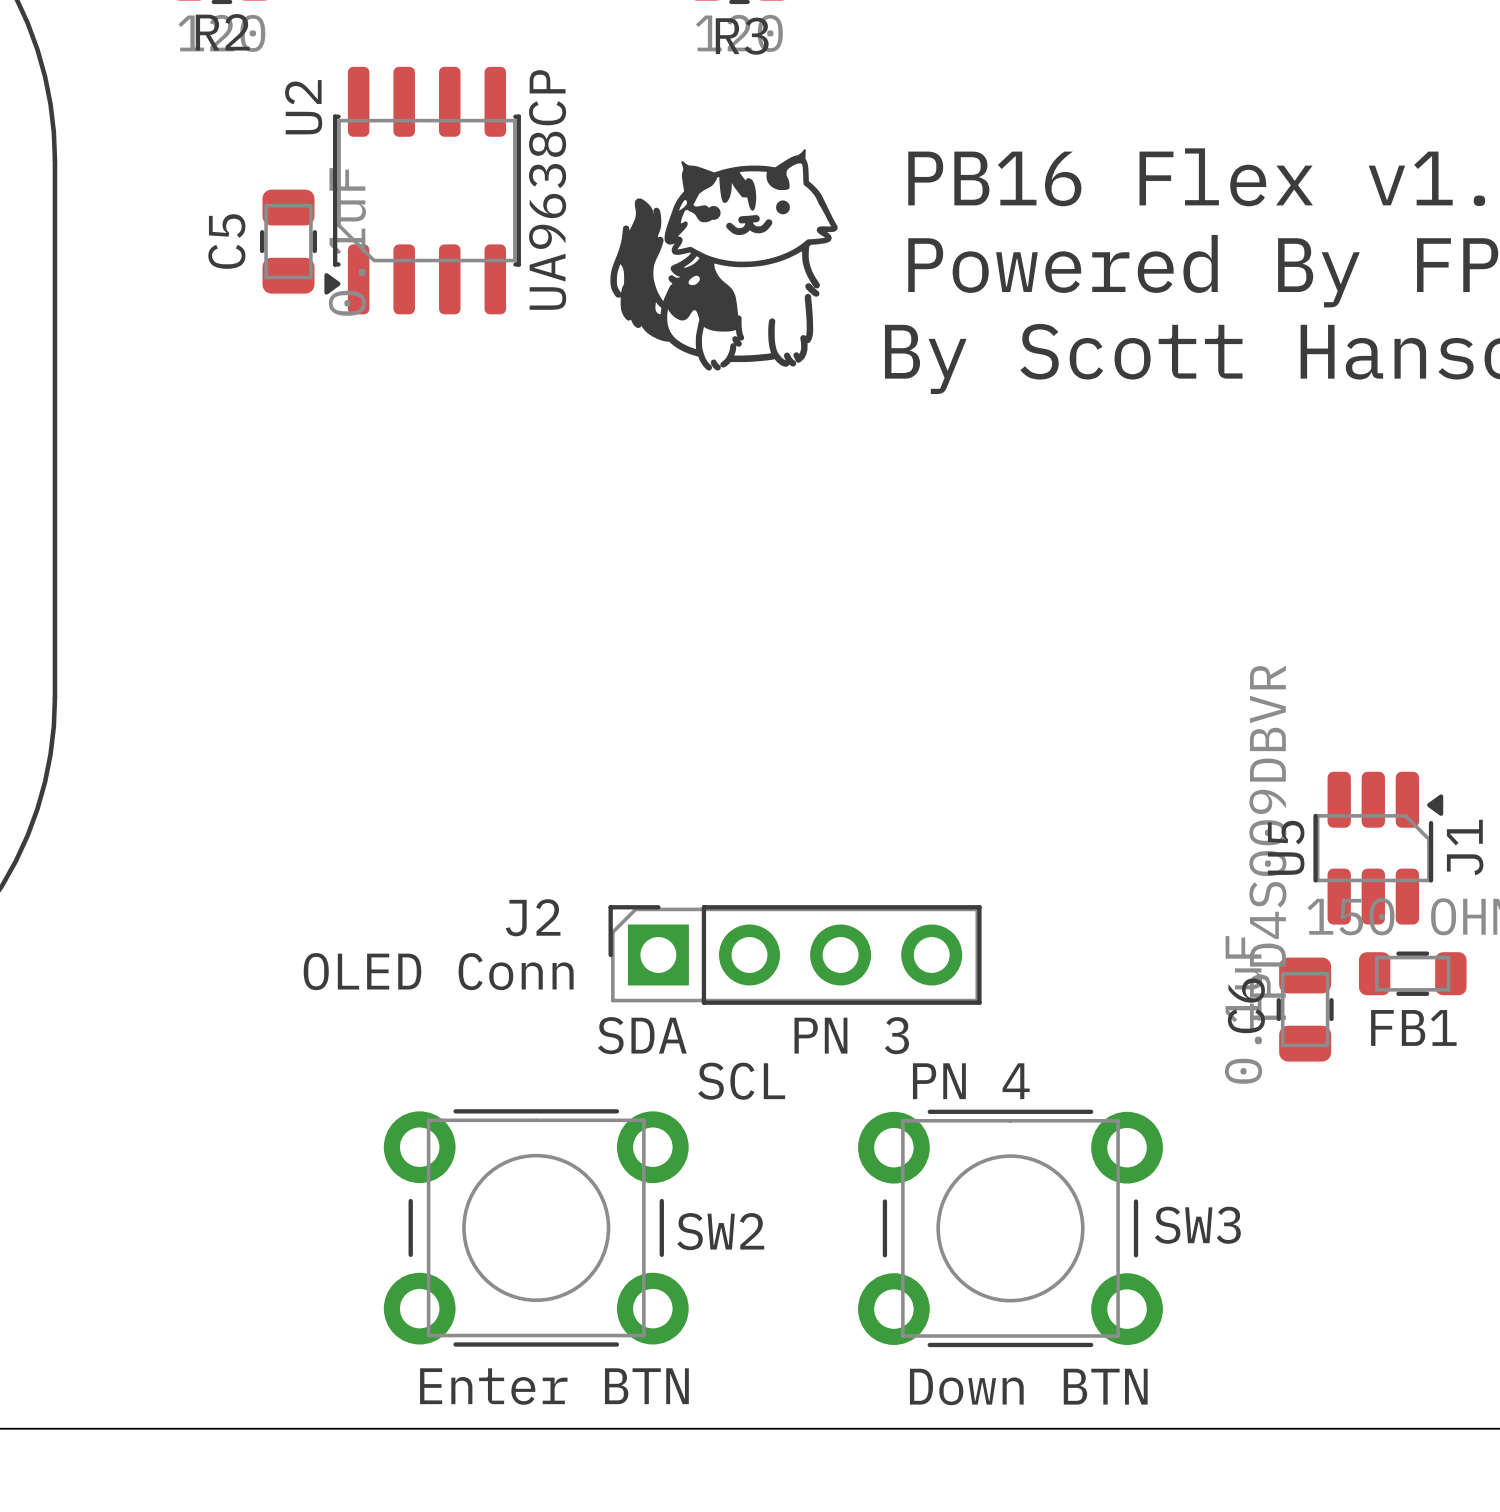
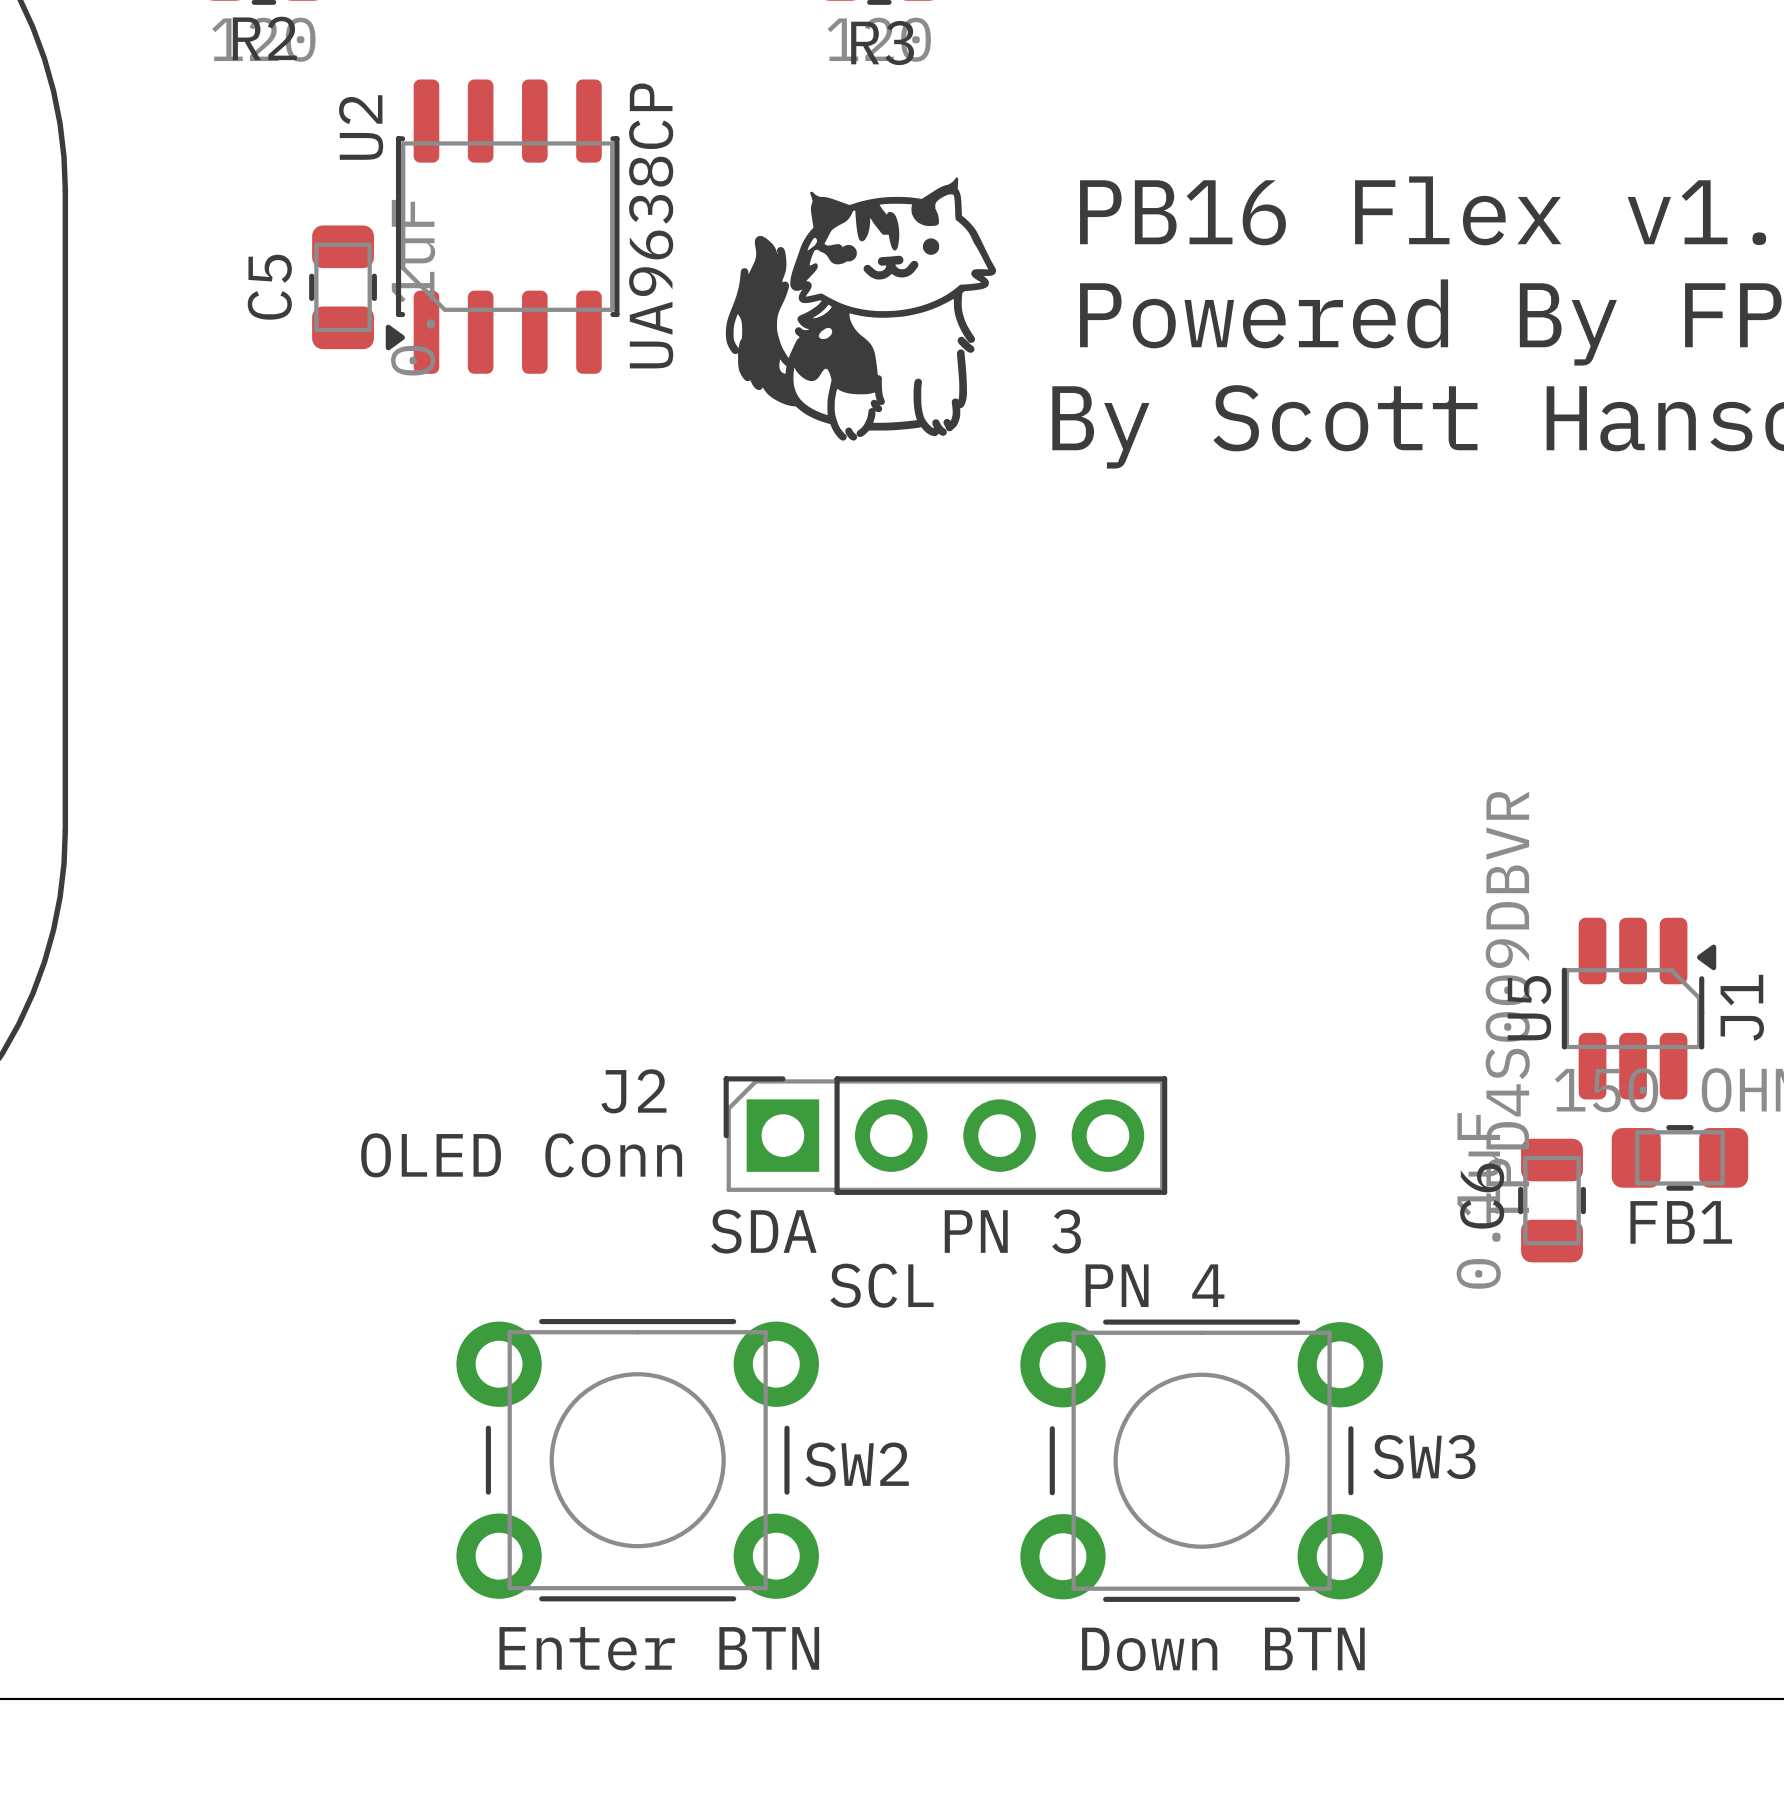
FB1 footprint: [1358, 951, 1467, 996] -> [1611, 1125, 1749, 1191]

